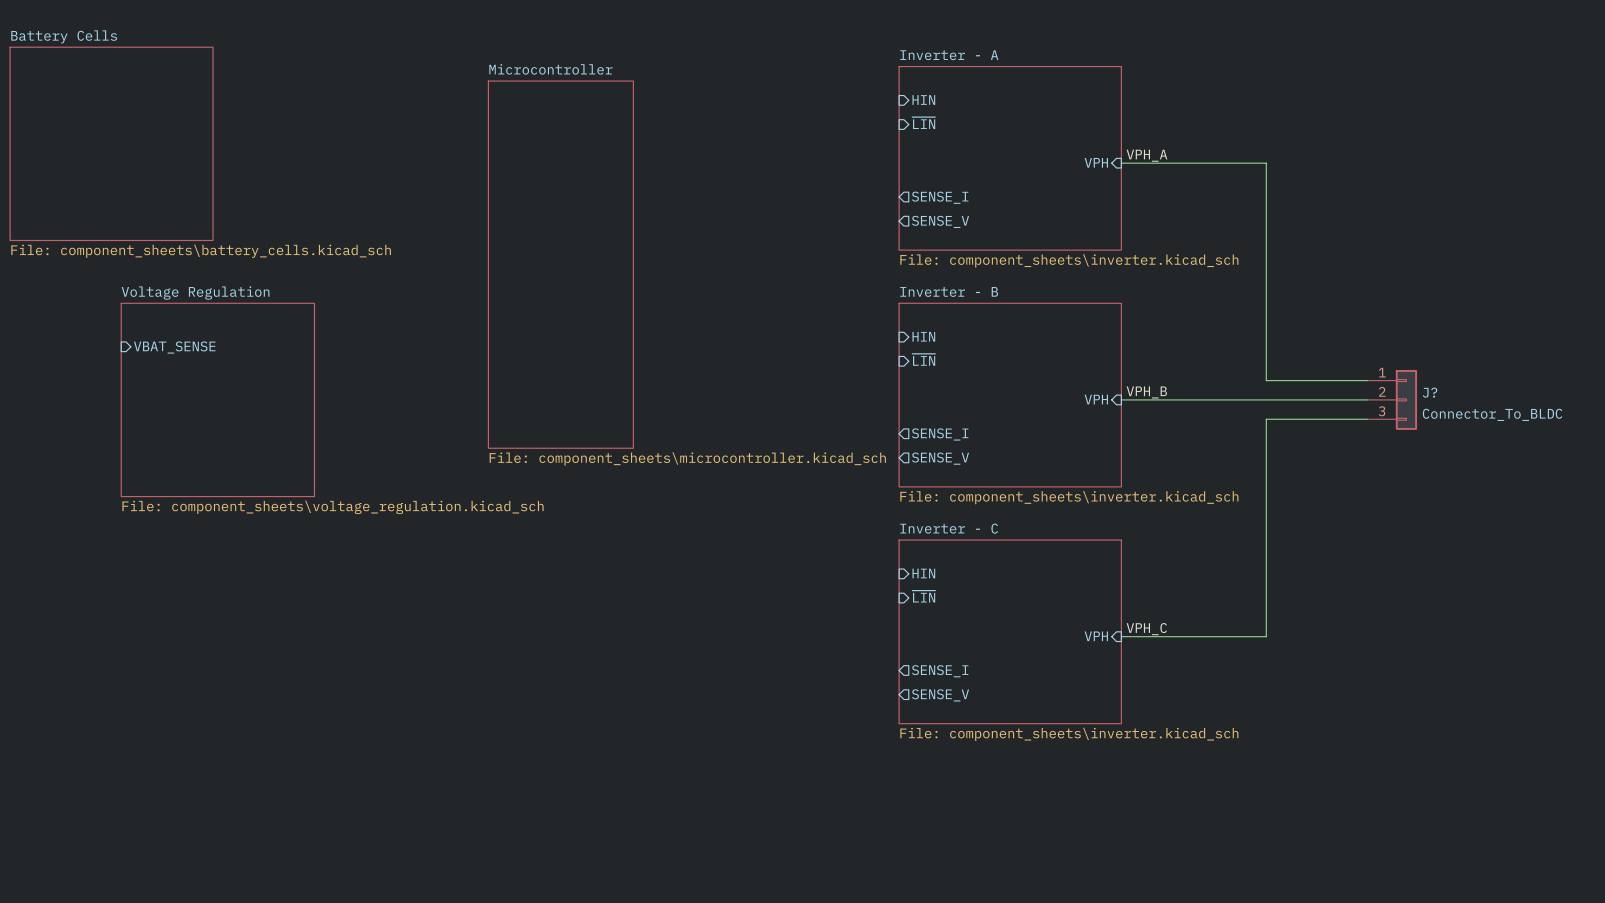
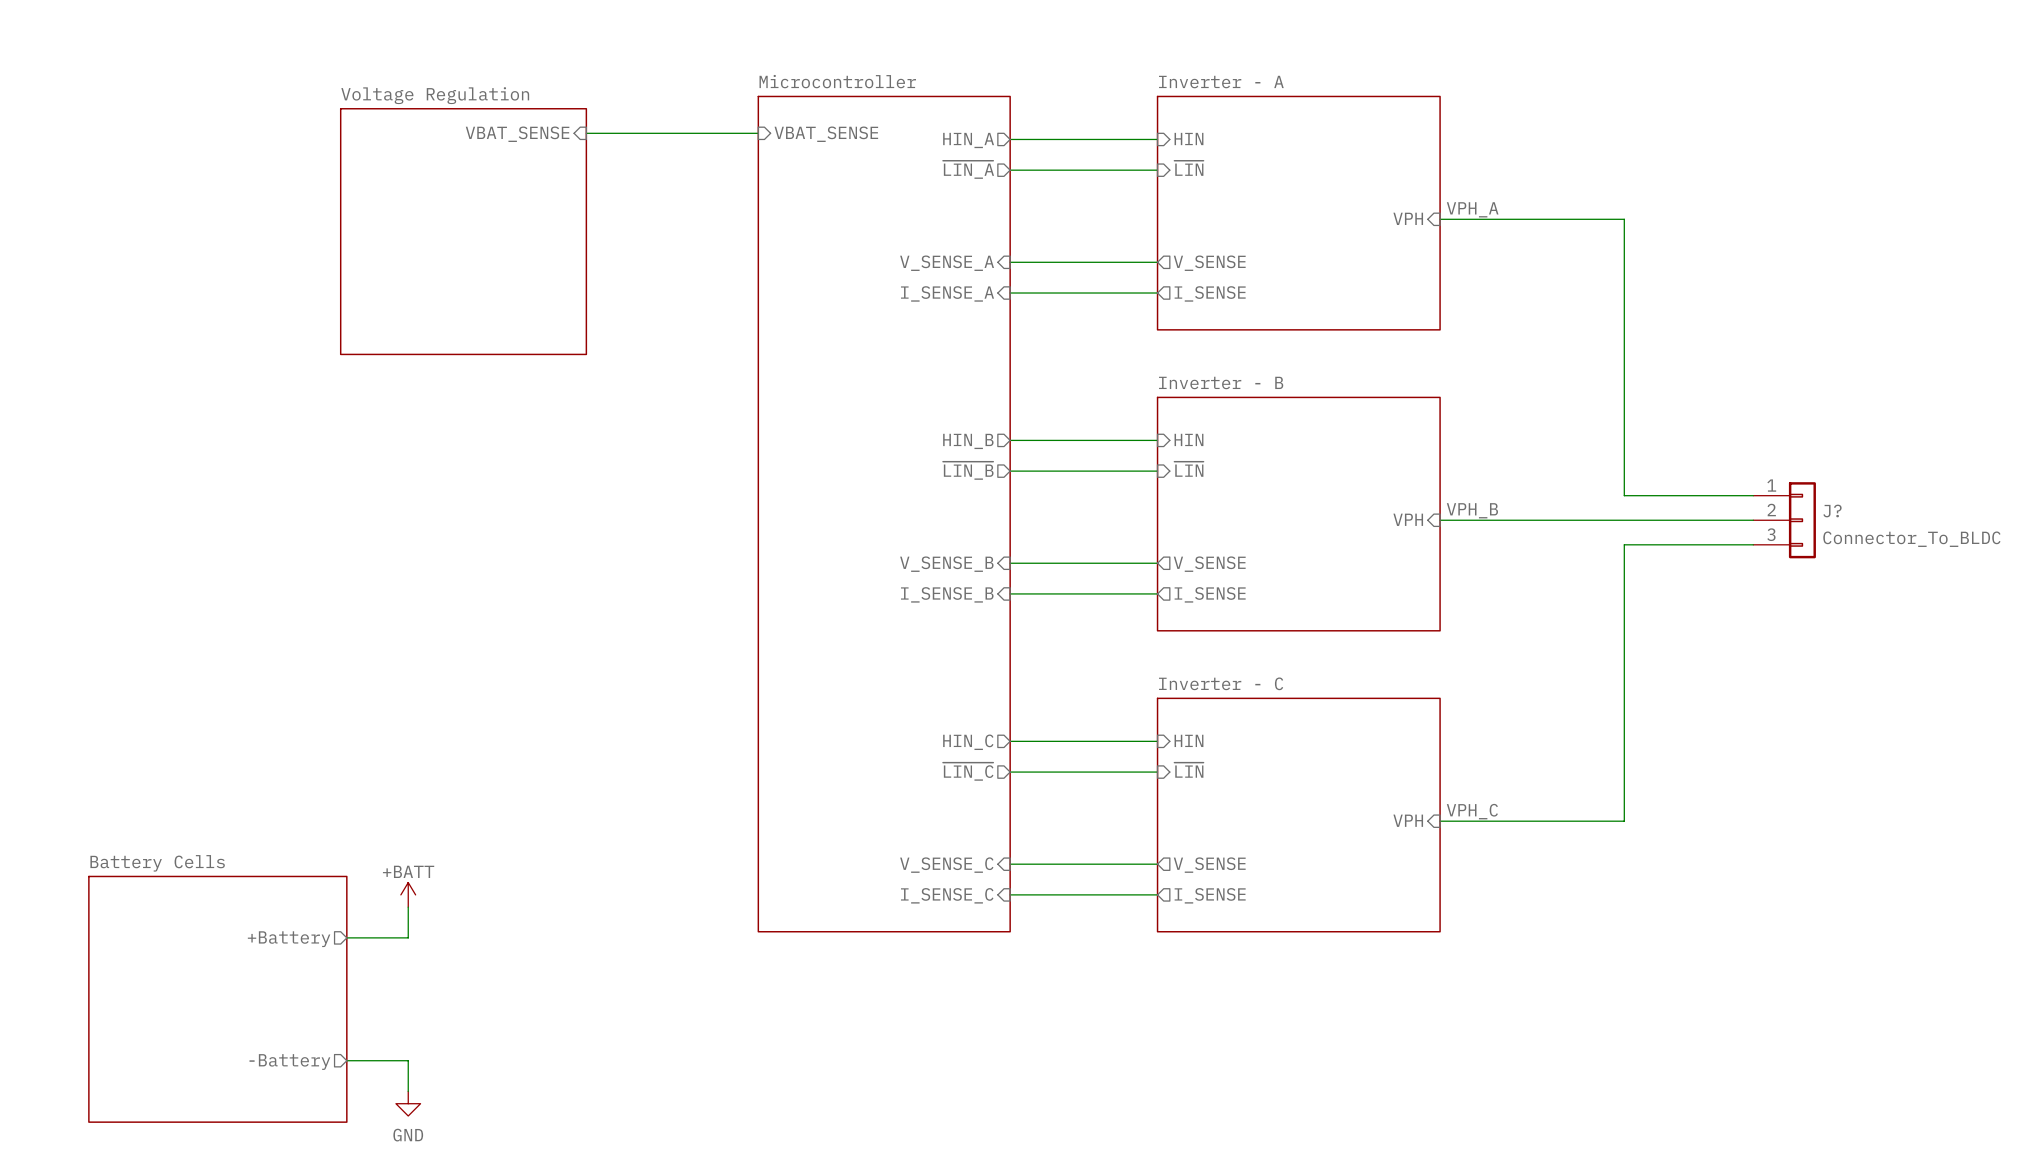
wire: none -> (586, 133) (758, 133)
sheet pin: none -> VBAT_SENSE (517, 134)
sheet pin: none -> VBAT_SENSE (826, 134)
wire: none -> (1010, 139) (1157, 139)
sheet pin: none -> HIN_A (968, 140)
sheet pin: none -> ~{LIN_A} (968, 169)
wire: none -> (1010, 170) (1157, 170)
sheet Battery Cells: File: component_sheets\battery_cells.kicad_sch (111, 143) -> none
sheet Voltage Regulation: none -> (463, 231)
sheet pin: none -> V_SENSE_A (947, 263)
wire: none -> (1010, 262) (1157, 262)
sheet pin: SENSE_I (940, 197) -> V_SENSE (1209, 263)
sheet pin: none -> I_SENSE_A (947, 293)
wire: none -> (1010, 293) (1157, 293)
sheet pin: SENSE_V (940, 221) -> I_SENSE (1210, 293)
sheet Inverter - A value: File: component_sheets\inverter.kicad_sch (1069, 260) -> none
sheet Microcontroller: File: component_sheets\microcontroller.kicad_sch (560, 264) -> none
sheet pin: none -> HIN_B (968, 441)
wire: none -> (1010, 440) (1157, 440)
sheet pin: VBAT_SENSE (174, 347) -> none
sheet pin: none -> ~{LIN_B} (968, 470)
wire: none -> (1010, 471) (1157, 471)
sheet Microcontroller: none -> (884, 514)
sheet Voltage Regulation: File: component_sheets\voltage_regulation.kicad_sch (217, 399) -> none
wire: none -> (1010, 563) (1157, 563)
sheet pin: none -> V_SENSE_B (946, 564)
sheet pin: SENSE_I (940, 434) -> V_SENSE (1209, 564)
wire: none -> (1010, 593) (1157, 593)
sheet pin: none -> I_SENSE_B (947, 594)
sheet pin: SENSE_V (940, 458) -> I_SENSE (1210, 594)
sheet Inverter - B value: File: component_sheets\inverter.kicad_sch (1069, 497) -> none
wire: none -> (1010, 741) (1157, 741)
sheet pin: none -> HIN_C (968, 742)
sheet pin: none -> ~{LIN_C} (968, 771)
wire: none -> (1010, 772) (1157, 772)
wire: none -> (1010, 864) (1157, 864)
sheet pin: none -> V_SENSE_C (946, 865)
sheet pin: SENSE_I (940, 671) -> V_SENSE (1209, 865)
power symbol: none -> +BATT (408, 894)
wire: none -> (1010, 894) (1157, 894)
sheet pin: none -> I_SENSE_C (947, 895)
sheet pin: SENSE_V (940, 695) -> I_SENSE (1210, 895)
wire: none -> (408, 907) (408, 937) (346, 937)
sheet pin: none -> +Battery (289, 939)
sheet Inverter - C value: File: component_sheets\inverter.kicad_sch (1069, 734) -> none
sheet Battery Cells: none -> (217, 999)
wire: none -> (346, 1060) (408, 1060) (408, 1091)
sheet pin: none -> -Battery (289, 1062)
power symbol: none -> GND (408, 1103)

